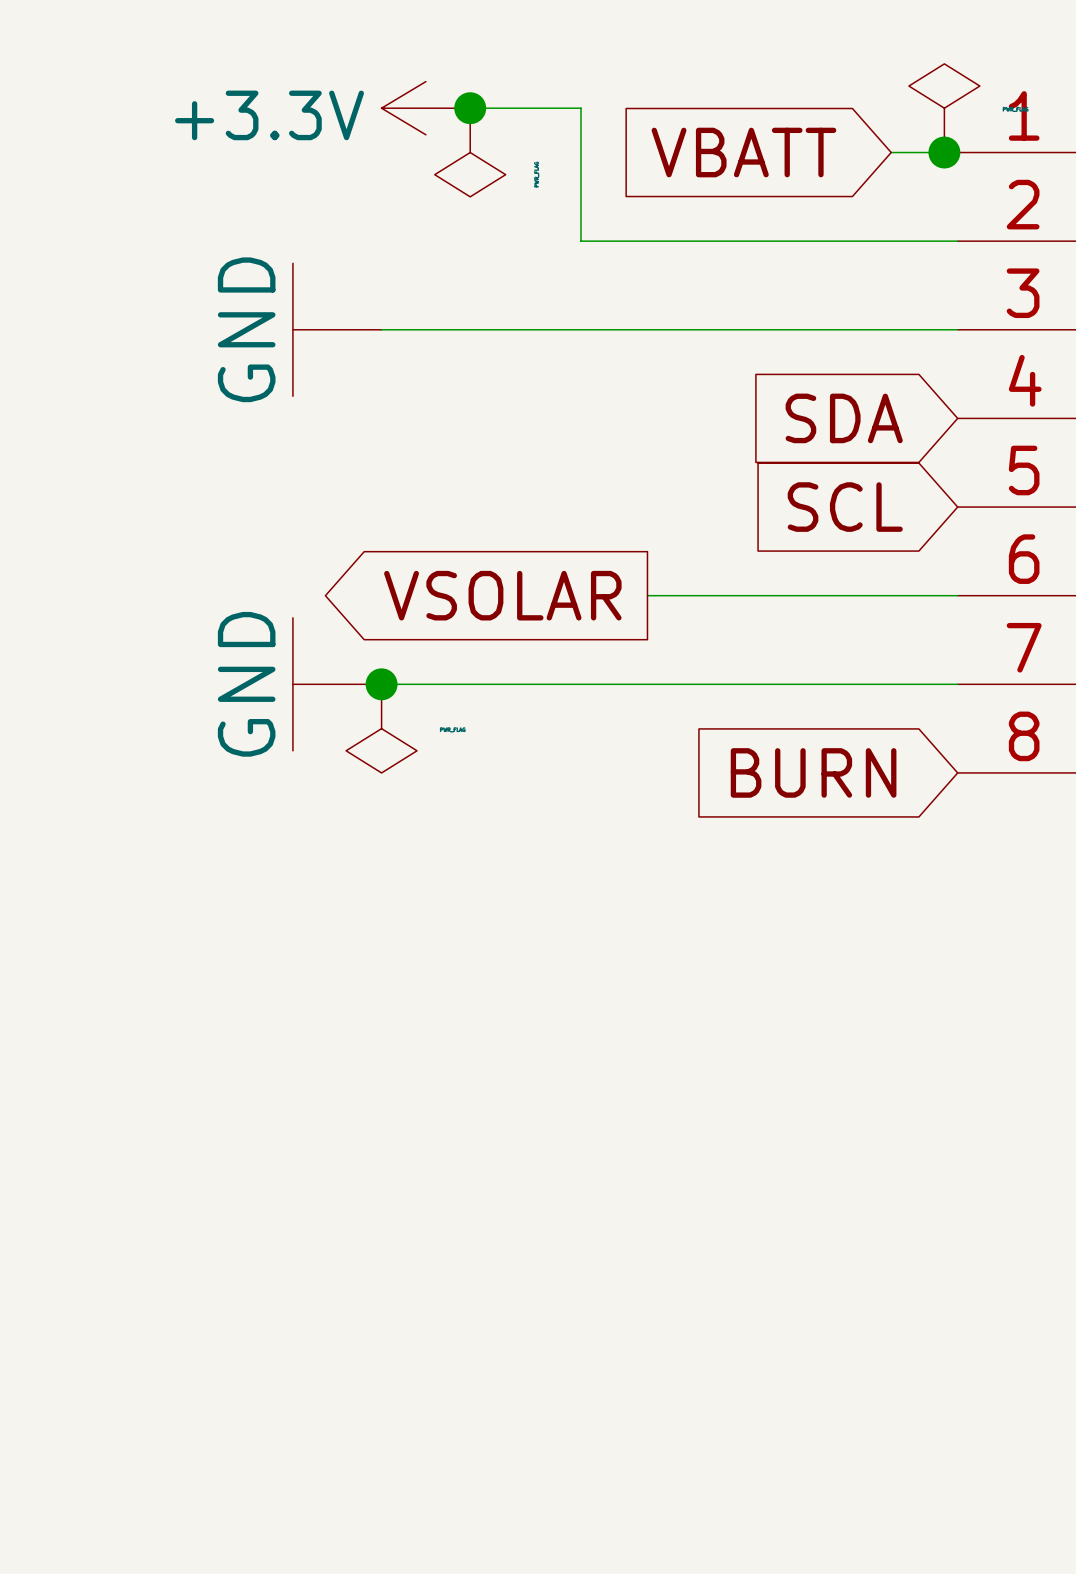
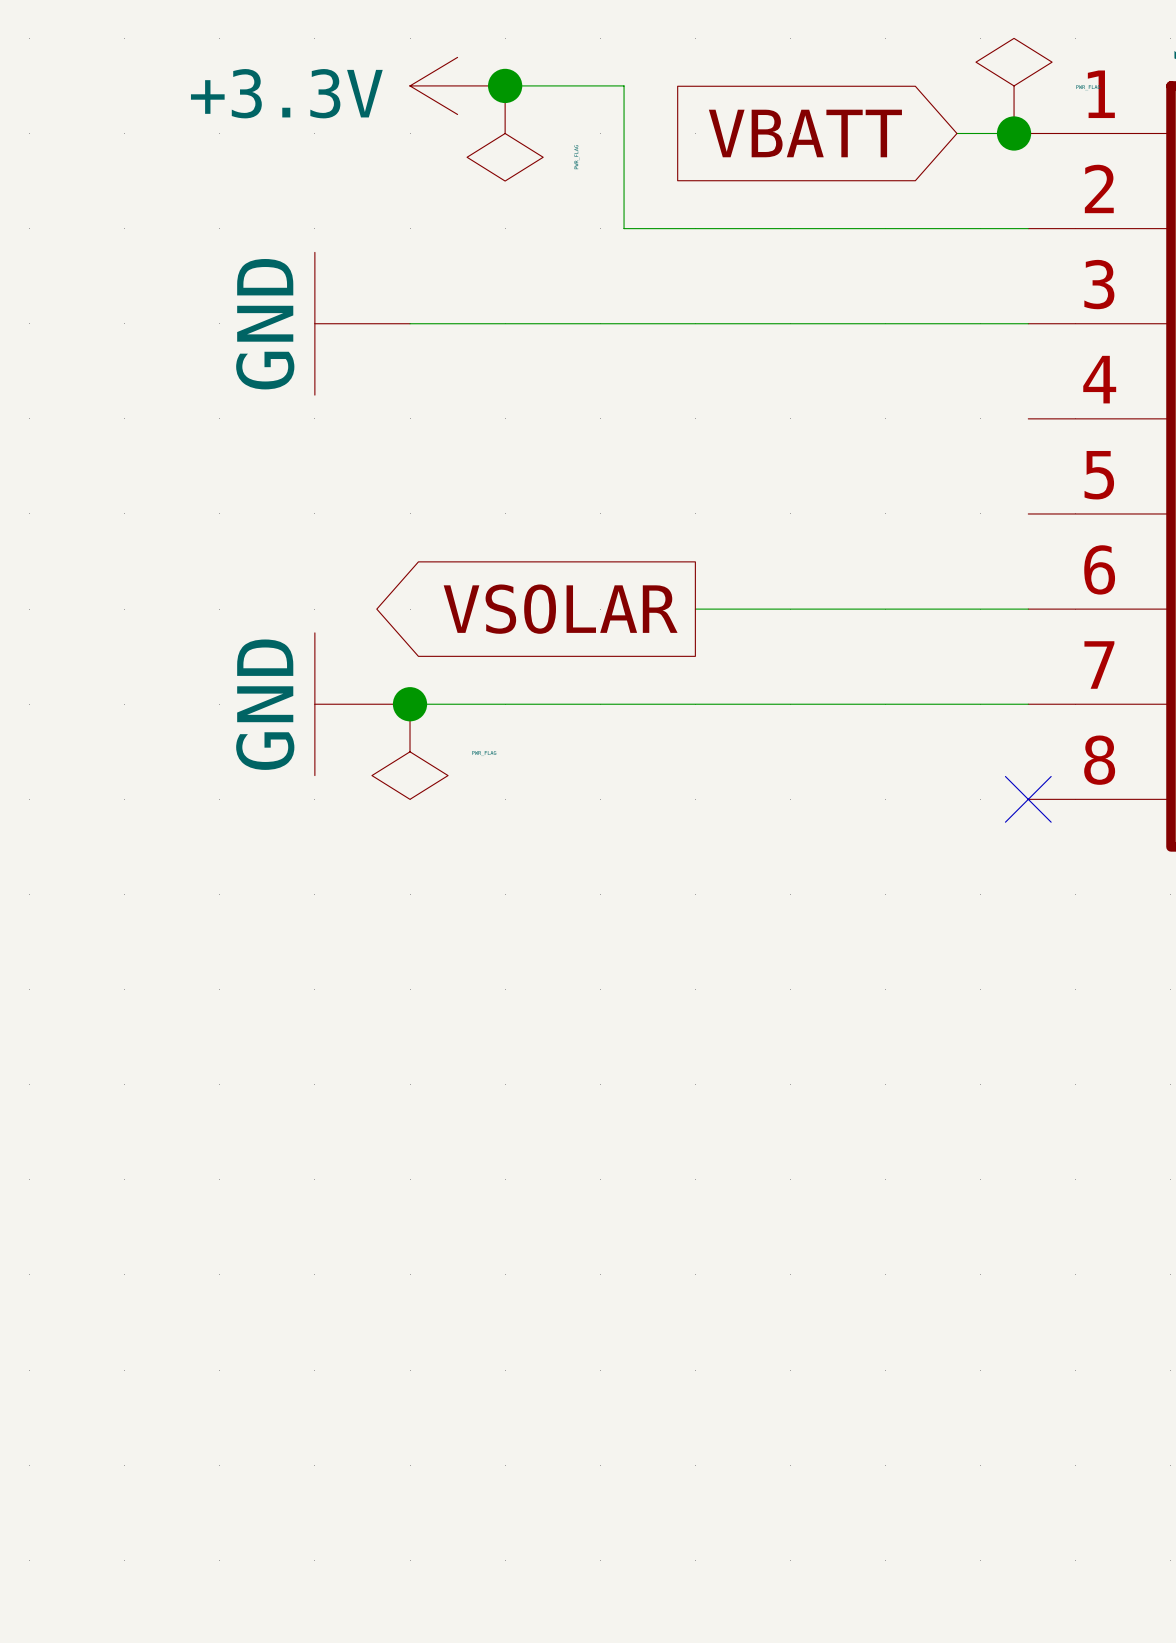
global label: SDA (844, 418) -> none
global label: SCL (845, 507) -> none
global label: BURN (813, 772) -> none
no-connect mark: none -> (1028, 799)

